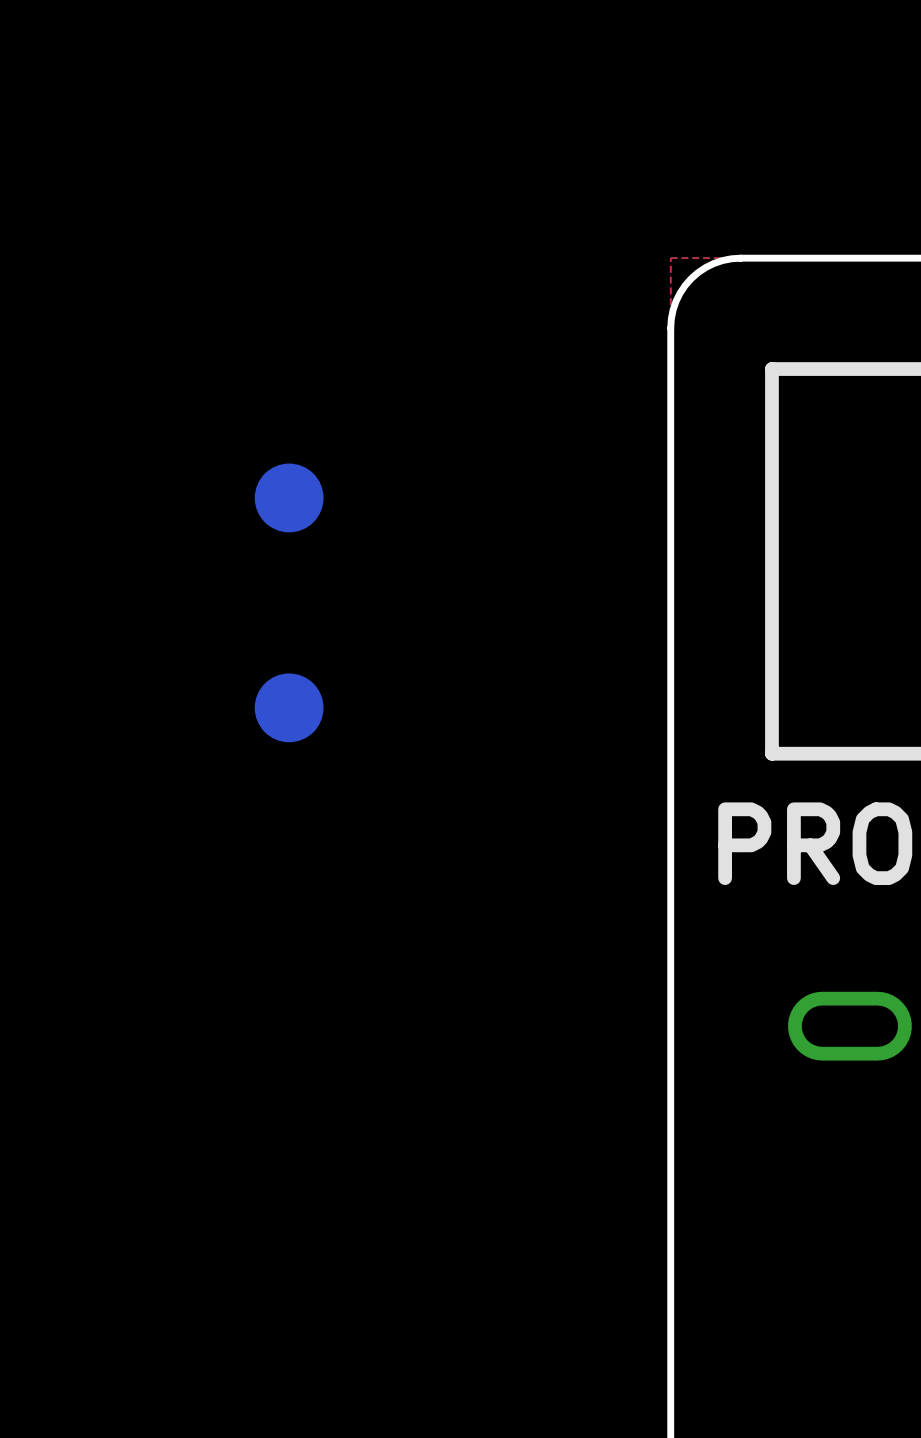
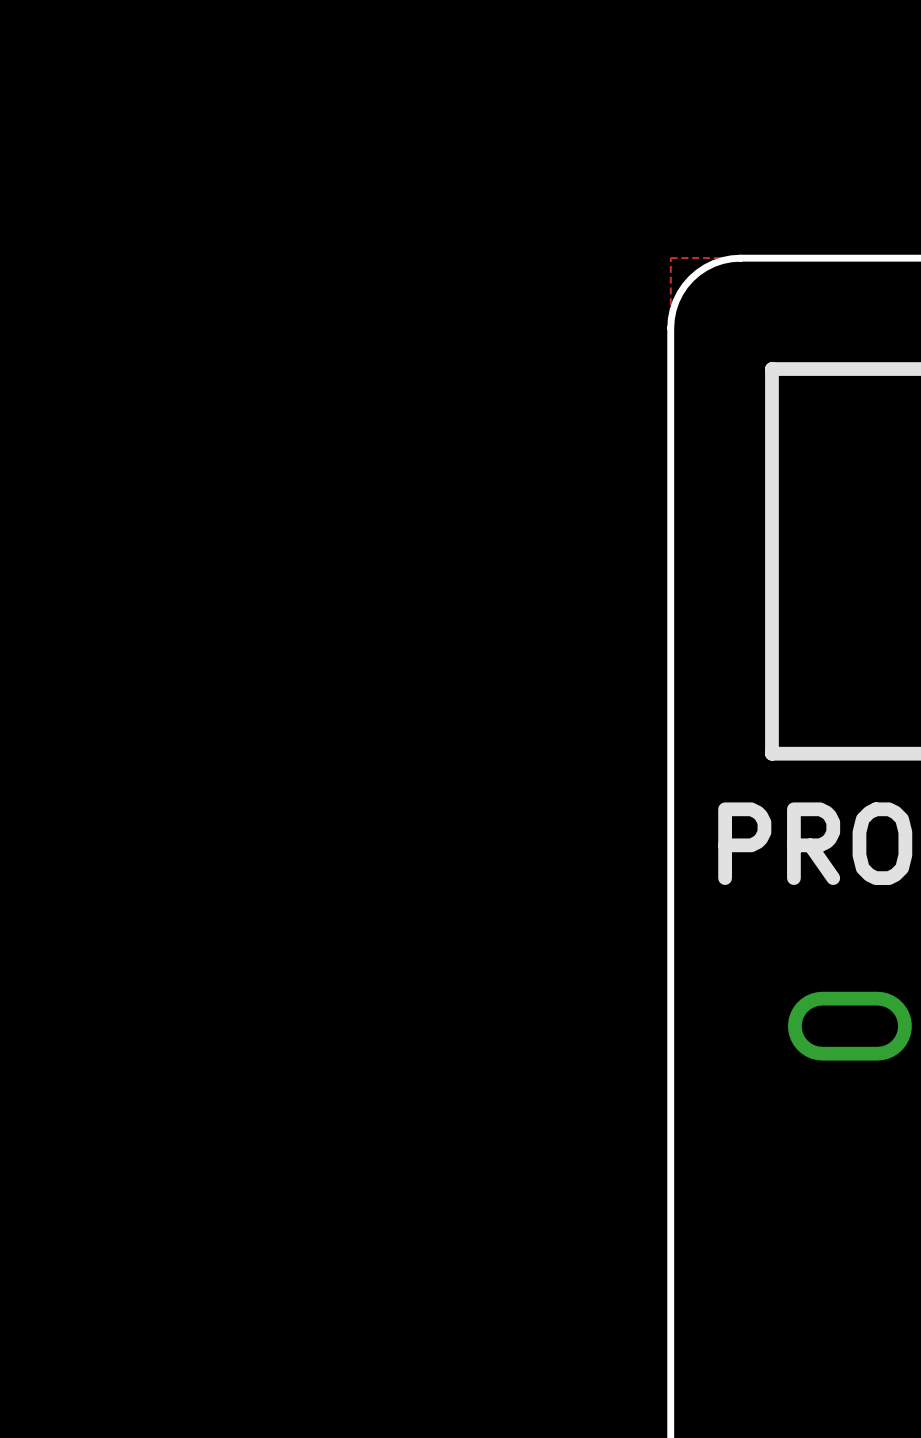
part: (289, 497) -> none
part: (289, 707) -> none

